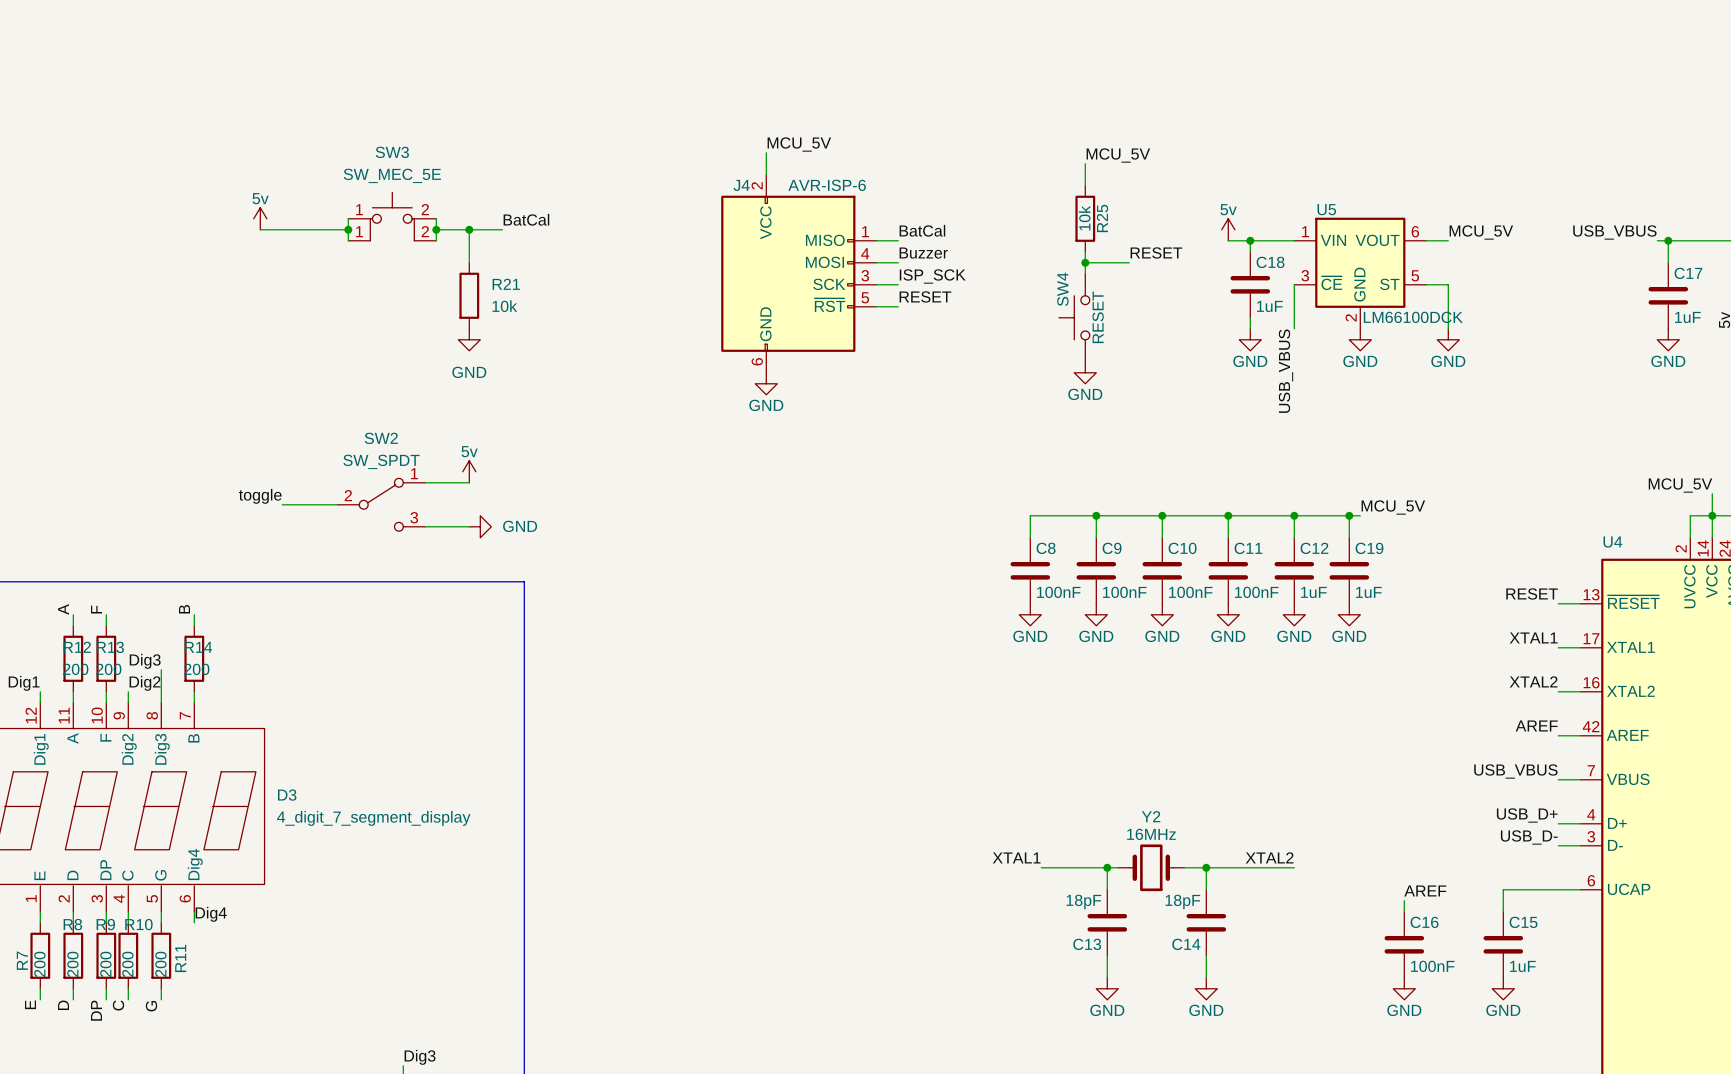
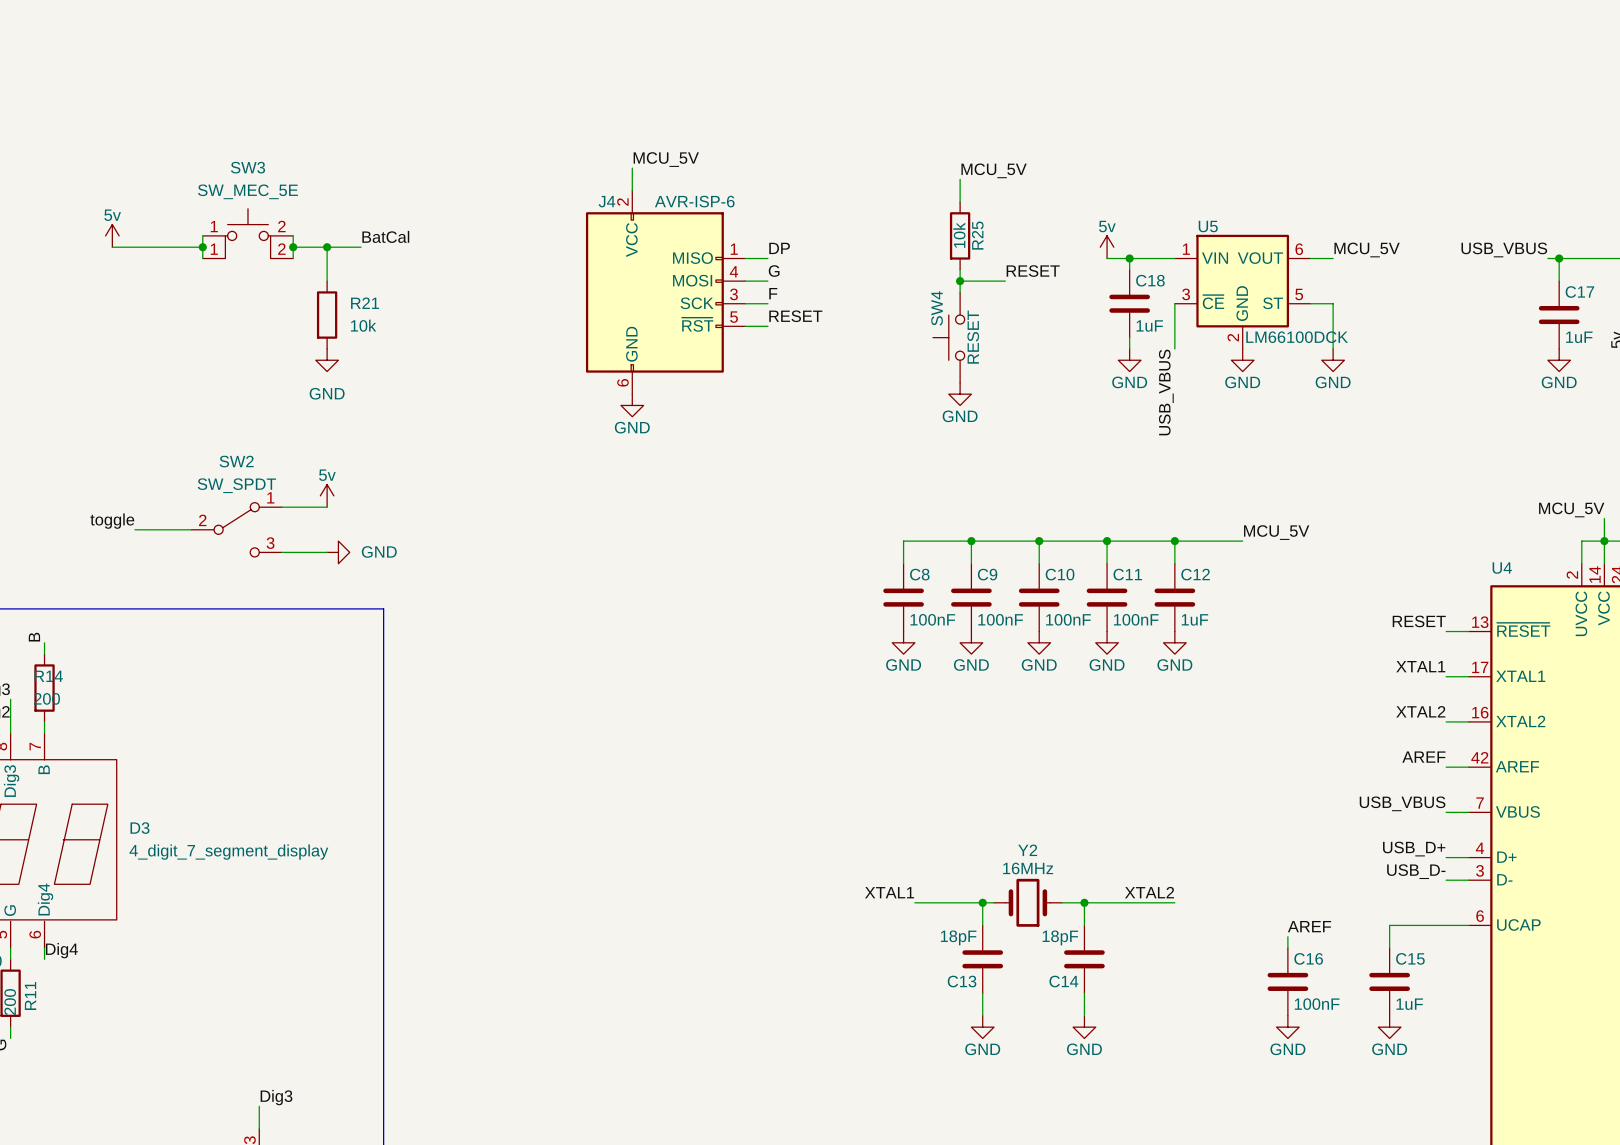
label: BatCal (922, 230) -> DP (779, 248)
label: Buzzer (923, 253) -> G (774, 271)
label: ISP_SCK (932, 276) -> F (773, 293)
wire: (1349, 515) (1349, 537) -> none
junction: (1349, 515) -> none
C19: 1uF (1349, 570) -> none
power symbol: GND (1349, 614) -> none

